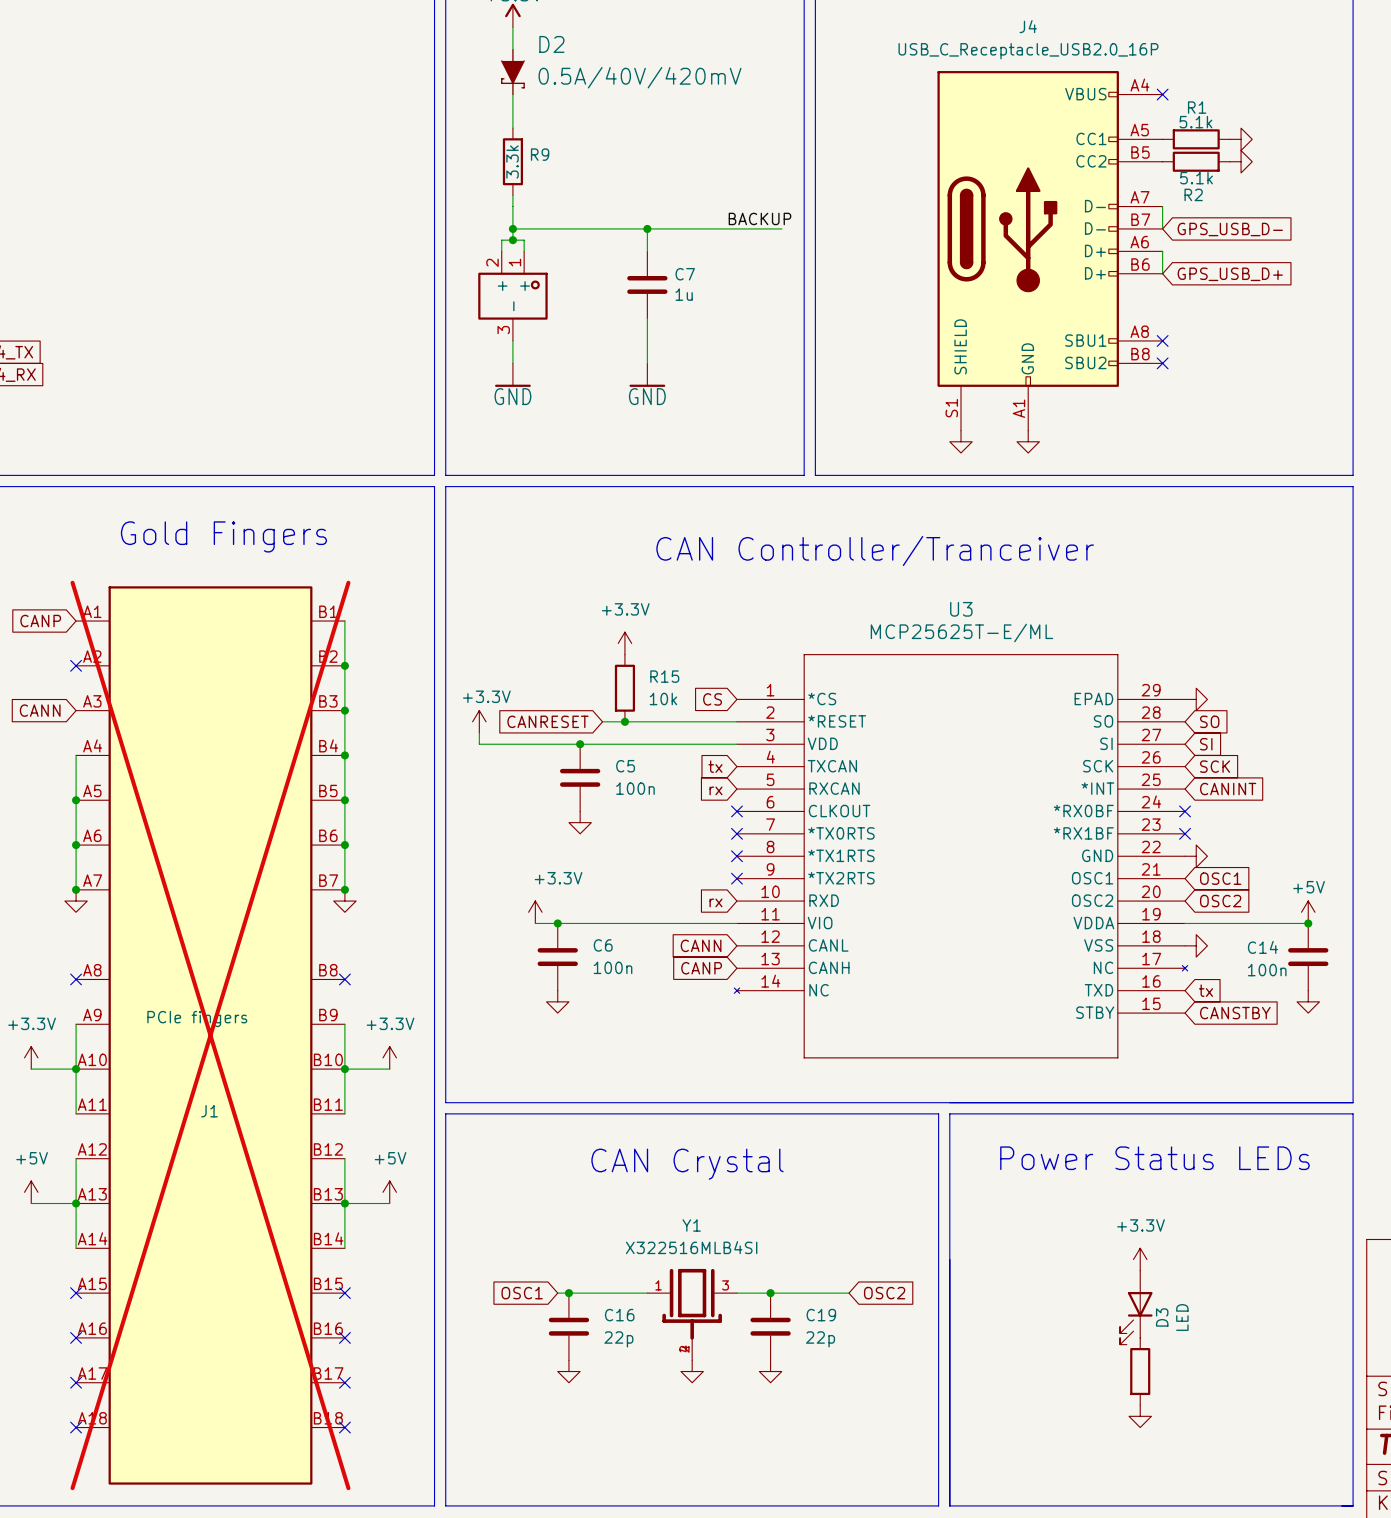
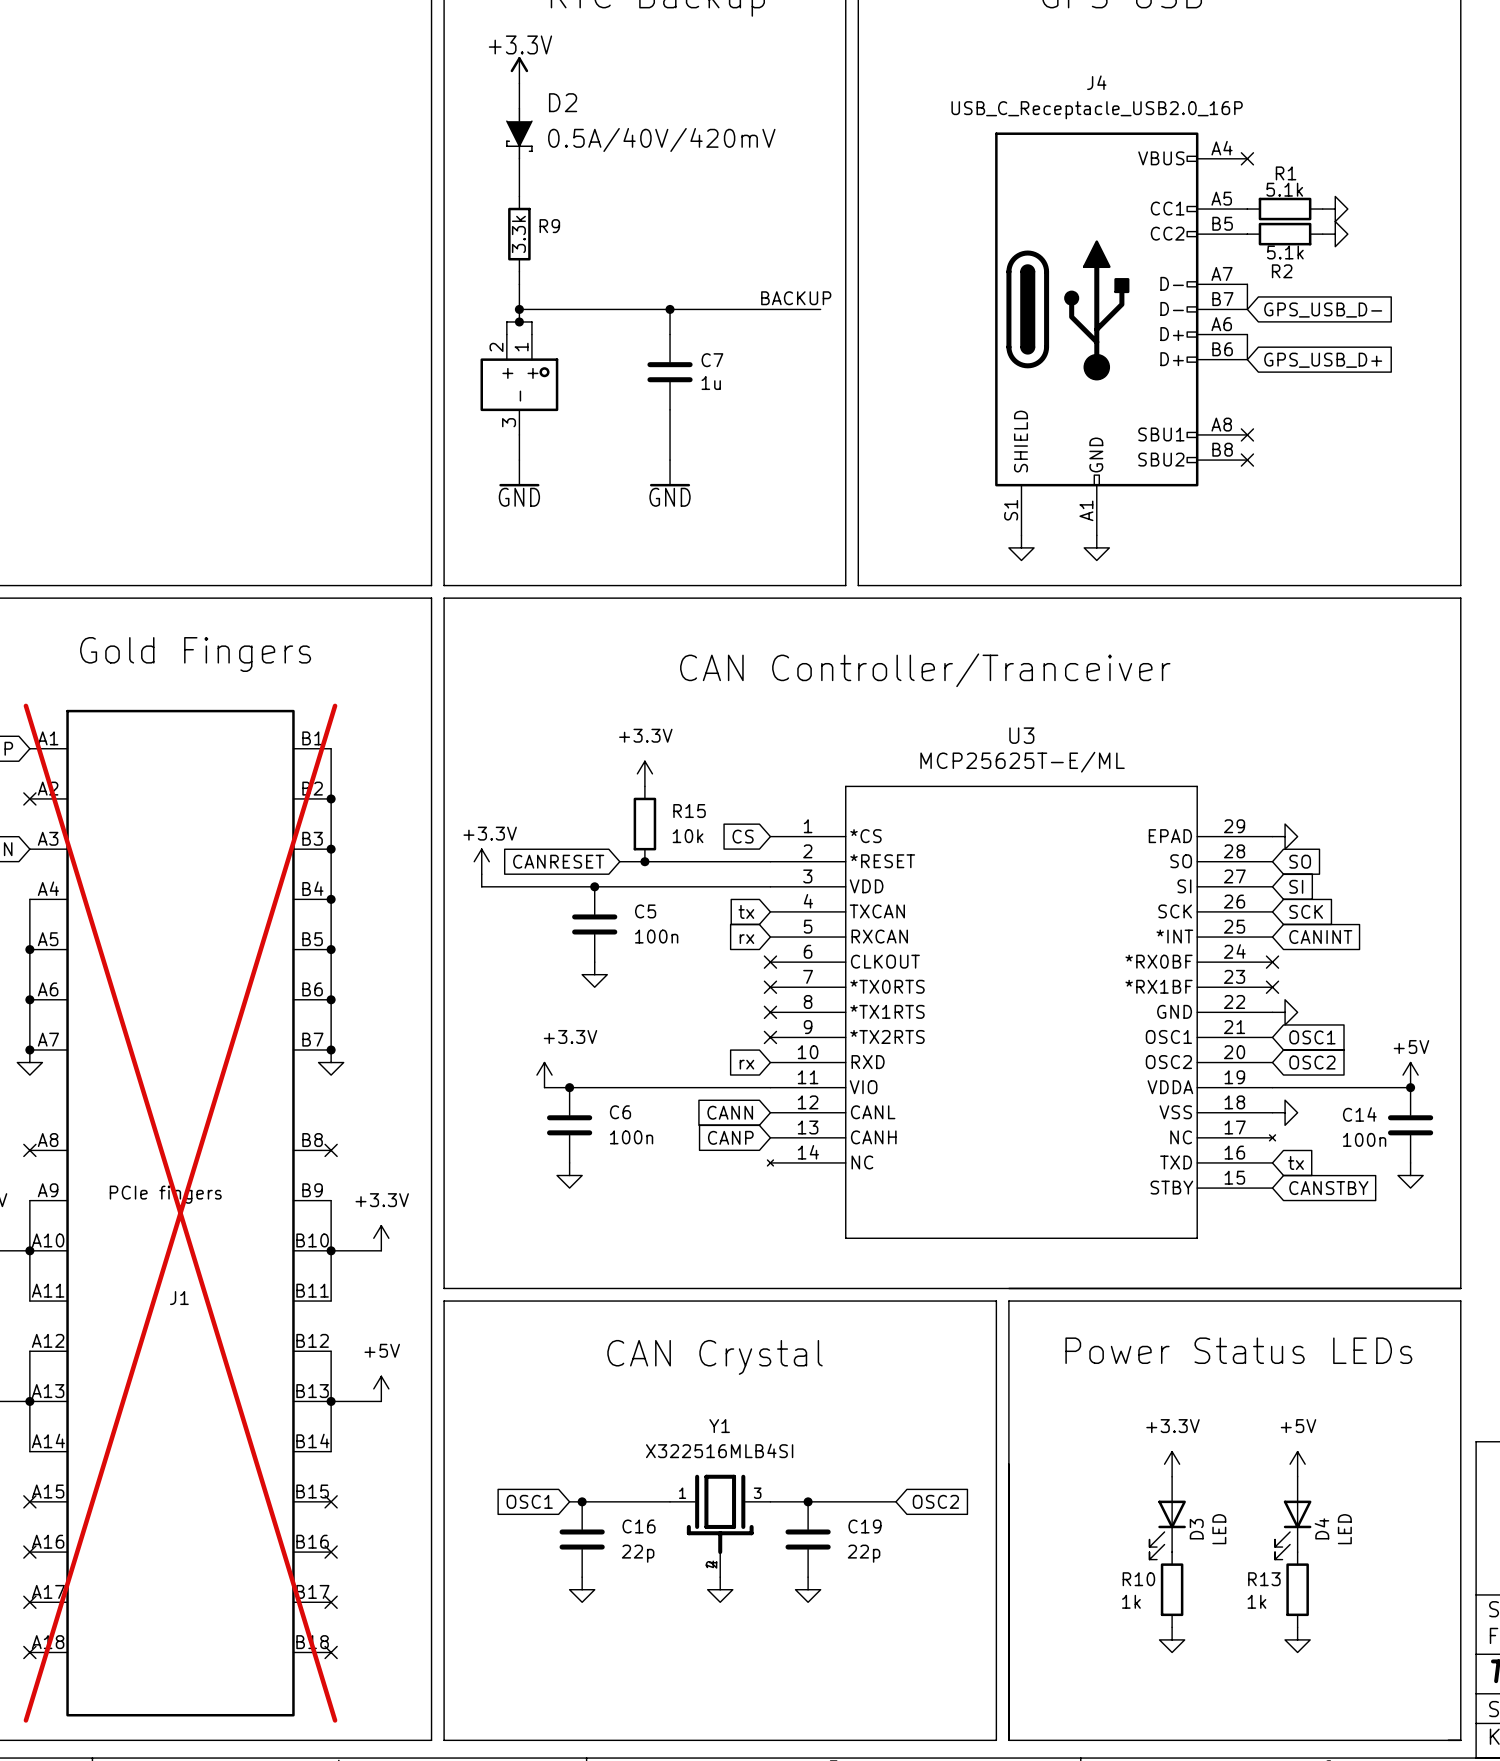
power symbol position: +3.3V (1140, 1259) -> +3.3V (1172, 1464)
power symbol: none -> +5V (1297, 1464)
D3 position: (1136, 1307) -> (1167, 1518)
D4: none -> LED (1293, 1518)
R10: none -> 1k (1172, 1589)
part: (1140, 1371) -> none
R13: none -> 1k (1297, 1589)
power symbol: none -> (1172, 1639)
power symbol: (1140, 1416) -> none
power symbol: none -> (1297, 1639)

